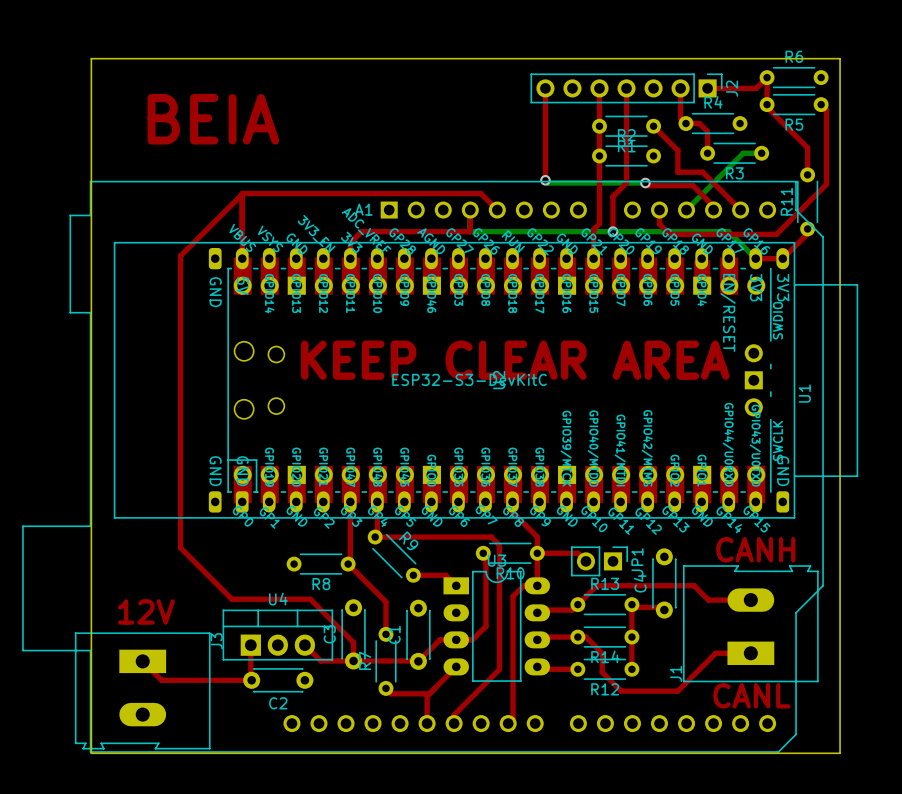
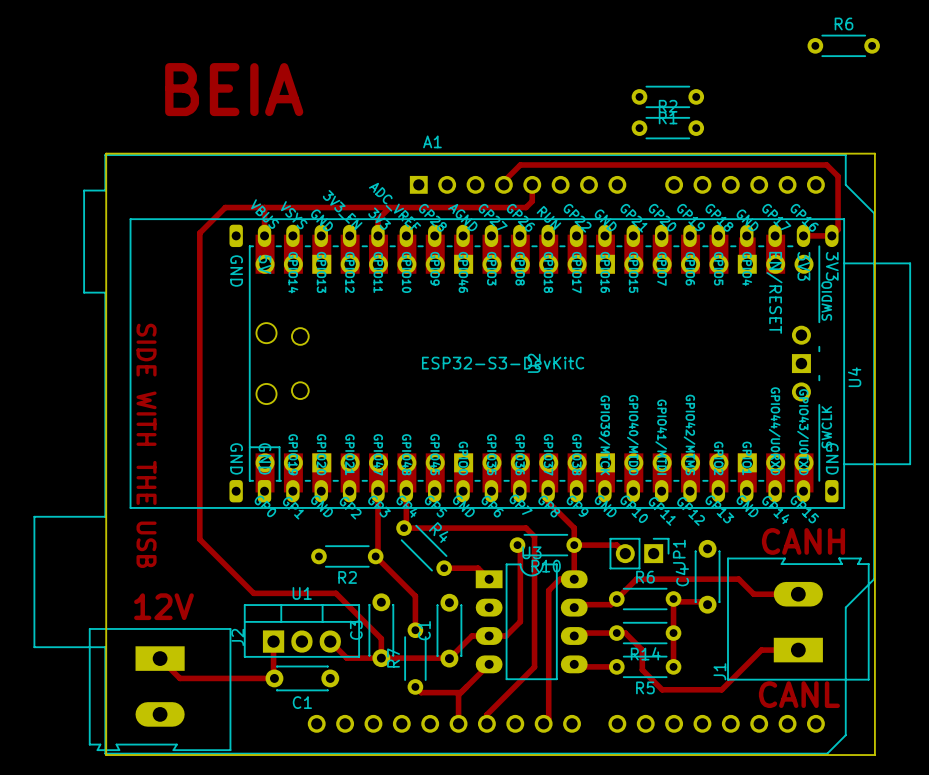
top track: (545, 88) (545, 180) -> none
top track: (599, 88) (599, 223) (593, 229) (593, 249) -> none
top track: (626, 88) (626, 183) (613, 196) (613, 231) -> none
J2: (626, 88) -> none
top track: (680, 88) (680, 118) (685, 123) (699, 123) (707, 131) (707, 153) -> none
top track: (707, 88) (756, 88) (767, 77) (767, 107) (807, 147) (807, 174) -> none
R5: (794, 104) -> none
top track: (821, 104) (826, 110) (826, 184) (776, 234) (669, 234) (659, 224) (659, 210) -> none
R4: (713, 123) -> none
top track: (653, 126) (677, 150) (677, 172) (702, 172) (740, 210) -> none
R3: (734, 153) -> none
bottom track: (761, 153) (743, 153) (686, 210) -> none
board edge: (91, 180) (91, 58) (840, 58) (840, 753) (823, 753) -> (106, 153) (874, 153) (874, 755)
bottom track: (545, 180) (548, 183) (645, 183) -> none
via: (545, 180) -> none
top track: (645, 183) (648, 185) (693, 185) (713, 206) (713, 210) -> none
via: (645, 183) -> none
top track: (242, 194) (204, 231) -> (389, 207) (225, 207)
R11: (807, 201) -> none
A1 name position: A1 (363, 209) -> A1 (432, 141)
top track: (470, 210) (469, 231) -> (532, 184) (532, 201) (526, 207) (503, 207)
bottom track: (470, 210) (469, 231) (728, 231) (755, 258) -> none
top track: (497, 210) (480, 193) (242, 193) (242, 231) -> none
top track: (807, 228) (807, 233) (788, 252) -> (503, 184) (503, 181) (520, 165) (826, 165) (838, 176) (838, 229)
via: (613, 231) -> none
text: KEEP CLEAR AREA (515, 360) -> none
U1 name: U1 (804, 393) -> U4 (854, 377)
text: none -> SIDE WITH THE USB (146, 445)
R9 name: R9 (408, 540) -> R4 (438, 532)
R13 name: R13 (605, 583) -> R6 (645, 577)
R8 name: R8 (321, 584) -> R2 (347, 577)
U4 name: U4 (278, 599) -> U1 (302, 593)
J3 name: J3 (216, 641) -> J2 (237, 637)
R12 name: R12 (605, 689) -> R5 (645, 687)
C2 name: C2 (278, 703) -> C1 (302, 702)

